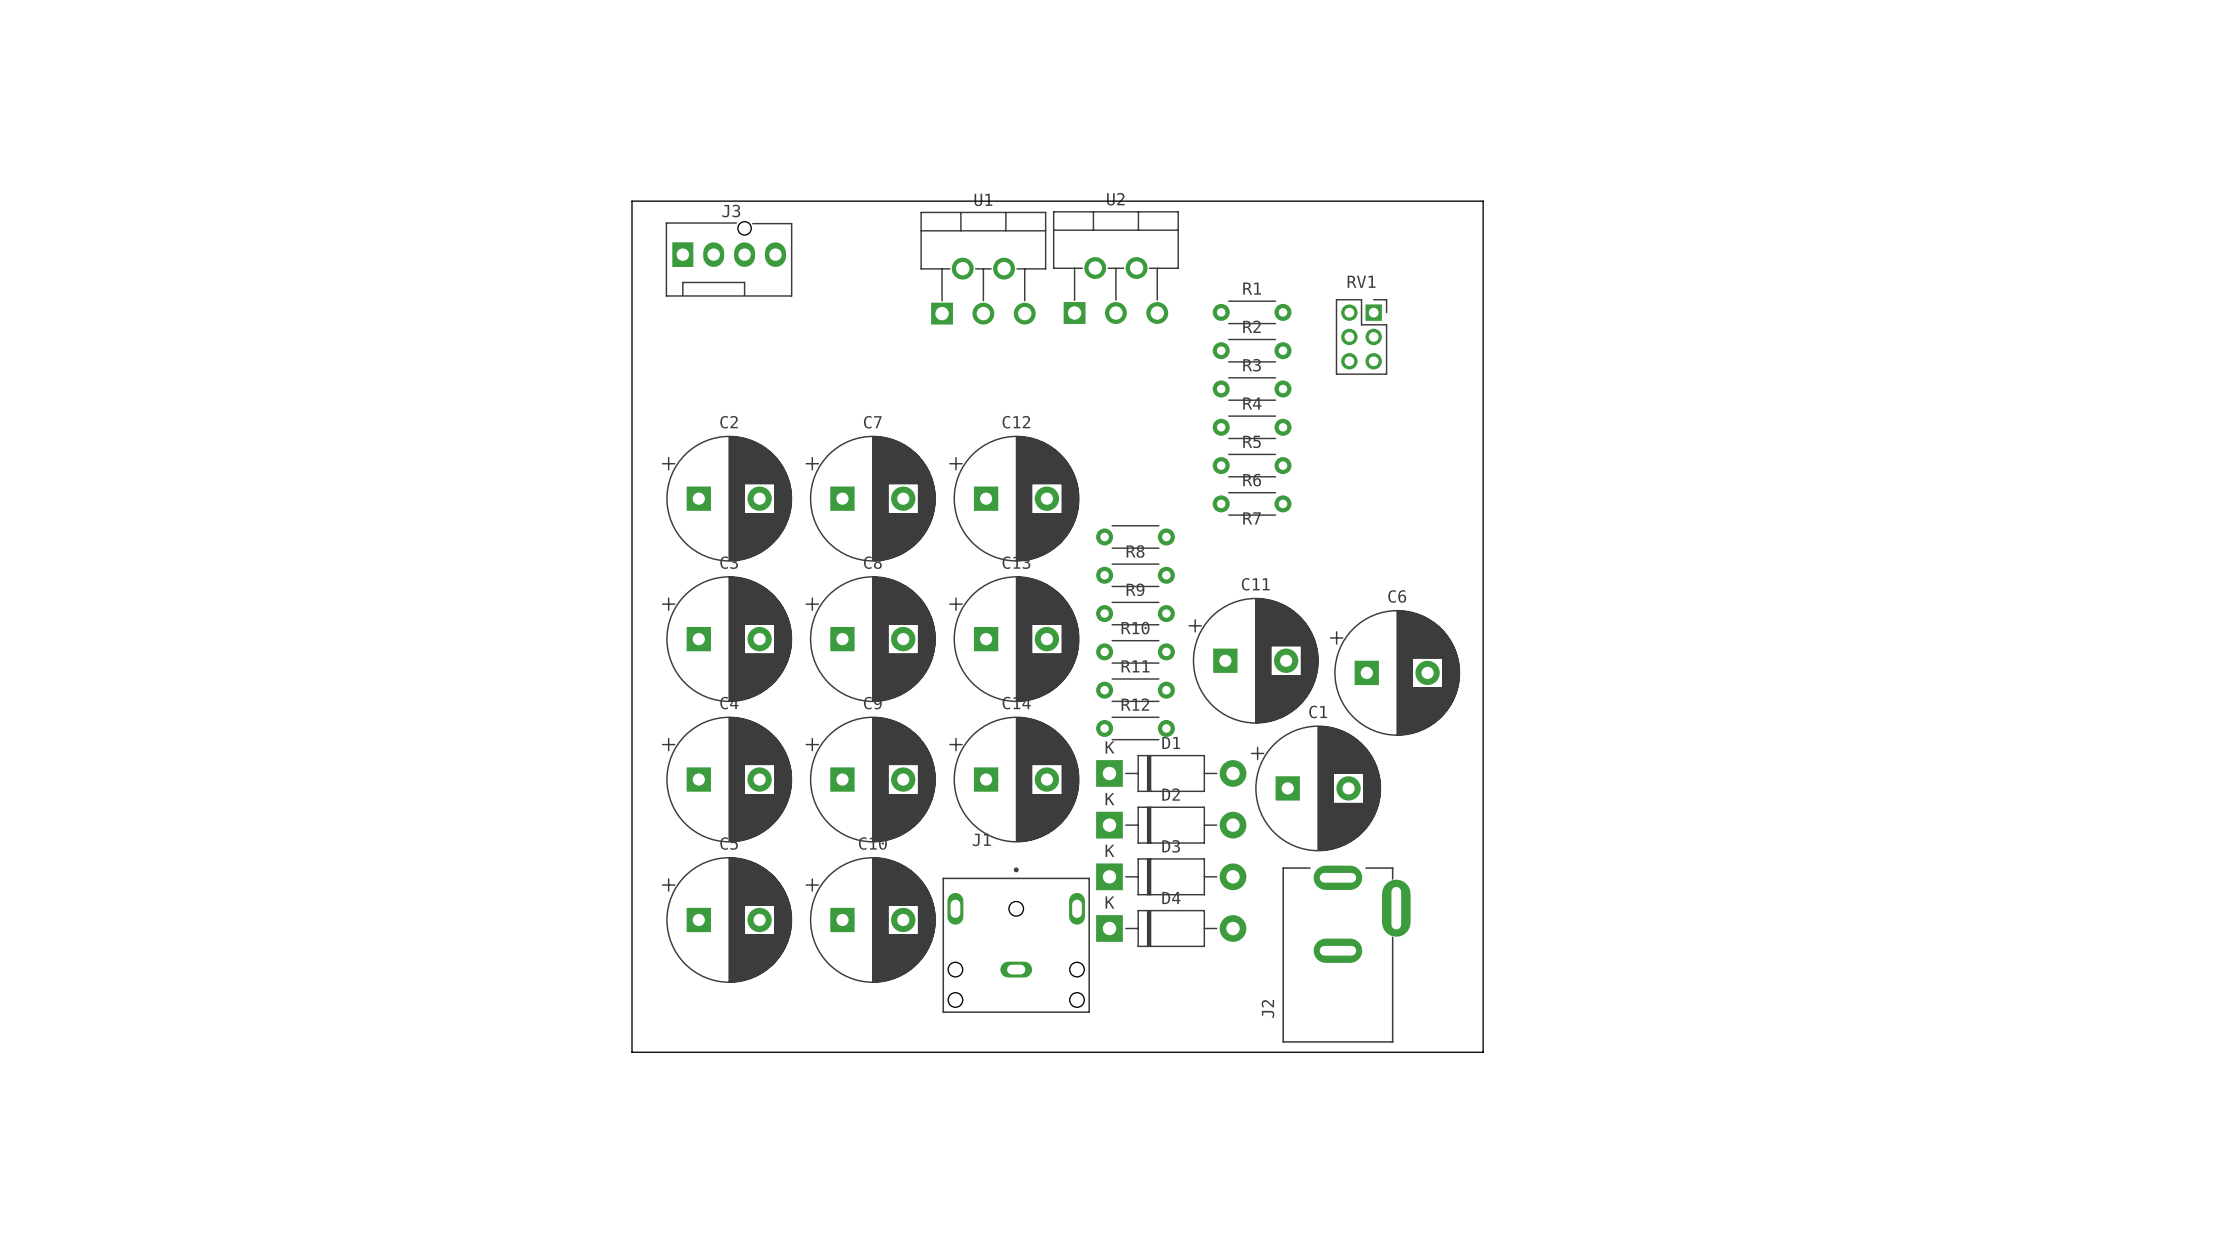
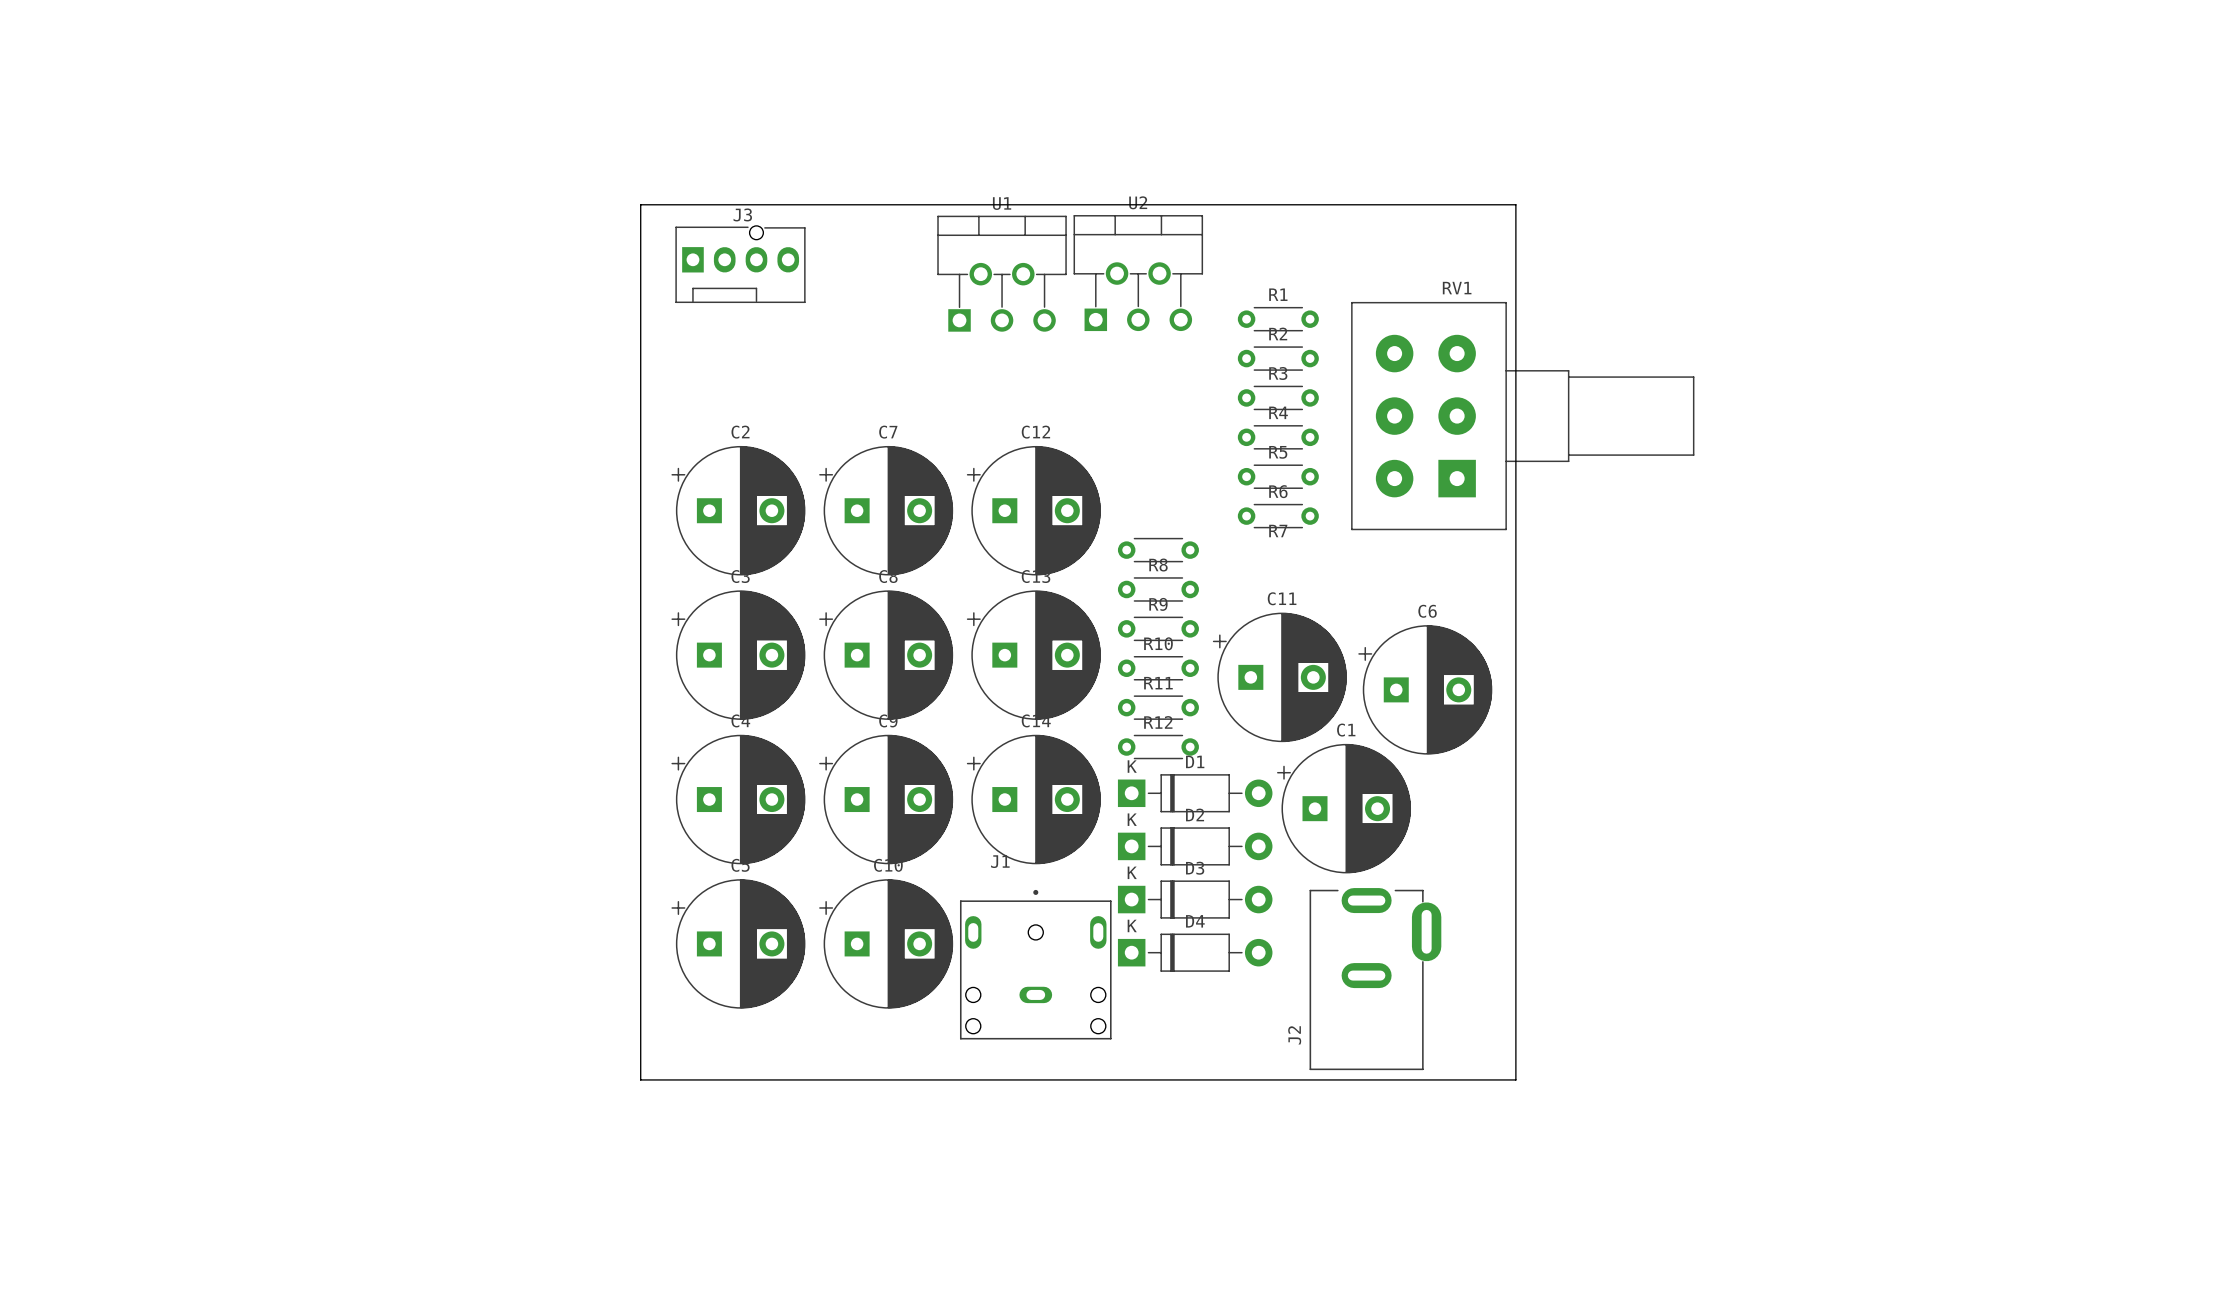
RV1 name position: RV1 (1361, 281) -> RV1 (1457, 288)
RV1 footprint: [1335, 299, 1388, 375] -> [1351, 301, 1695, 531]

